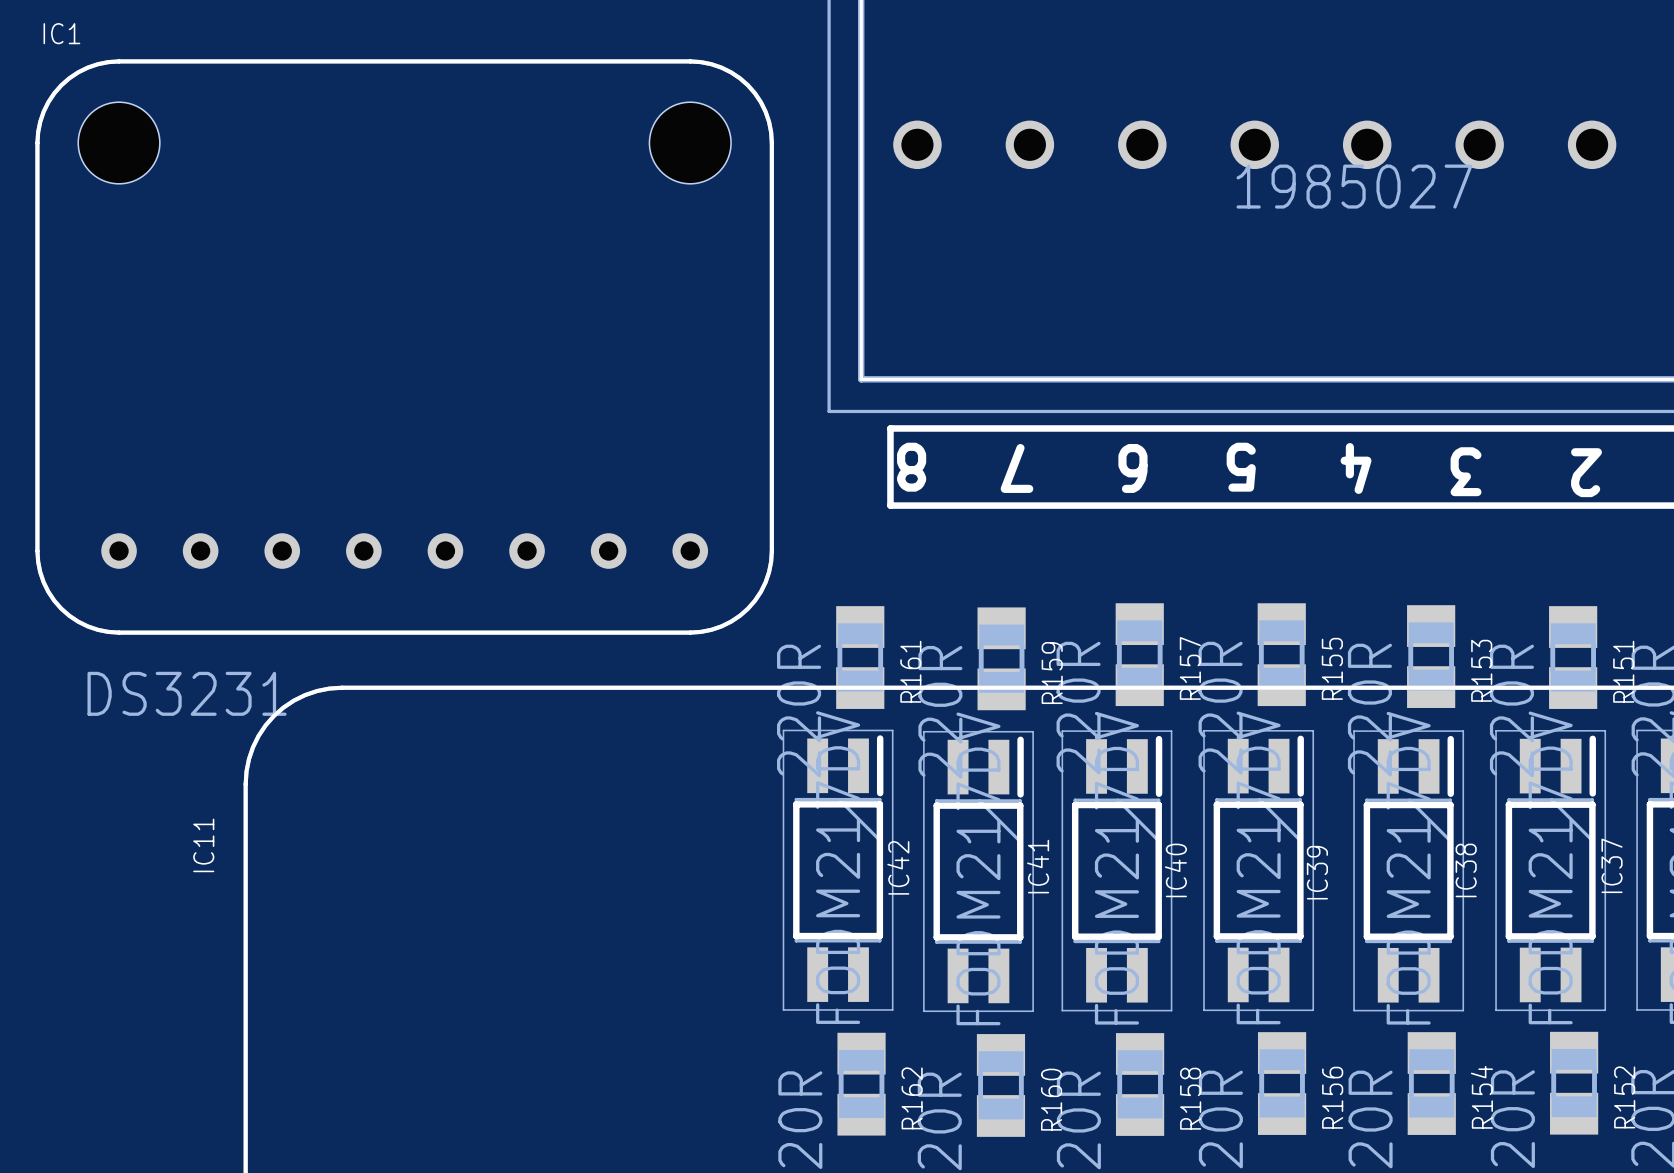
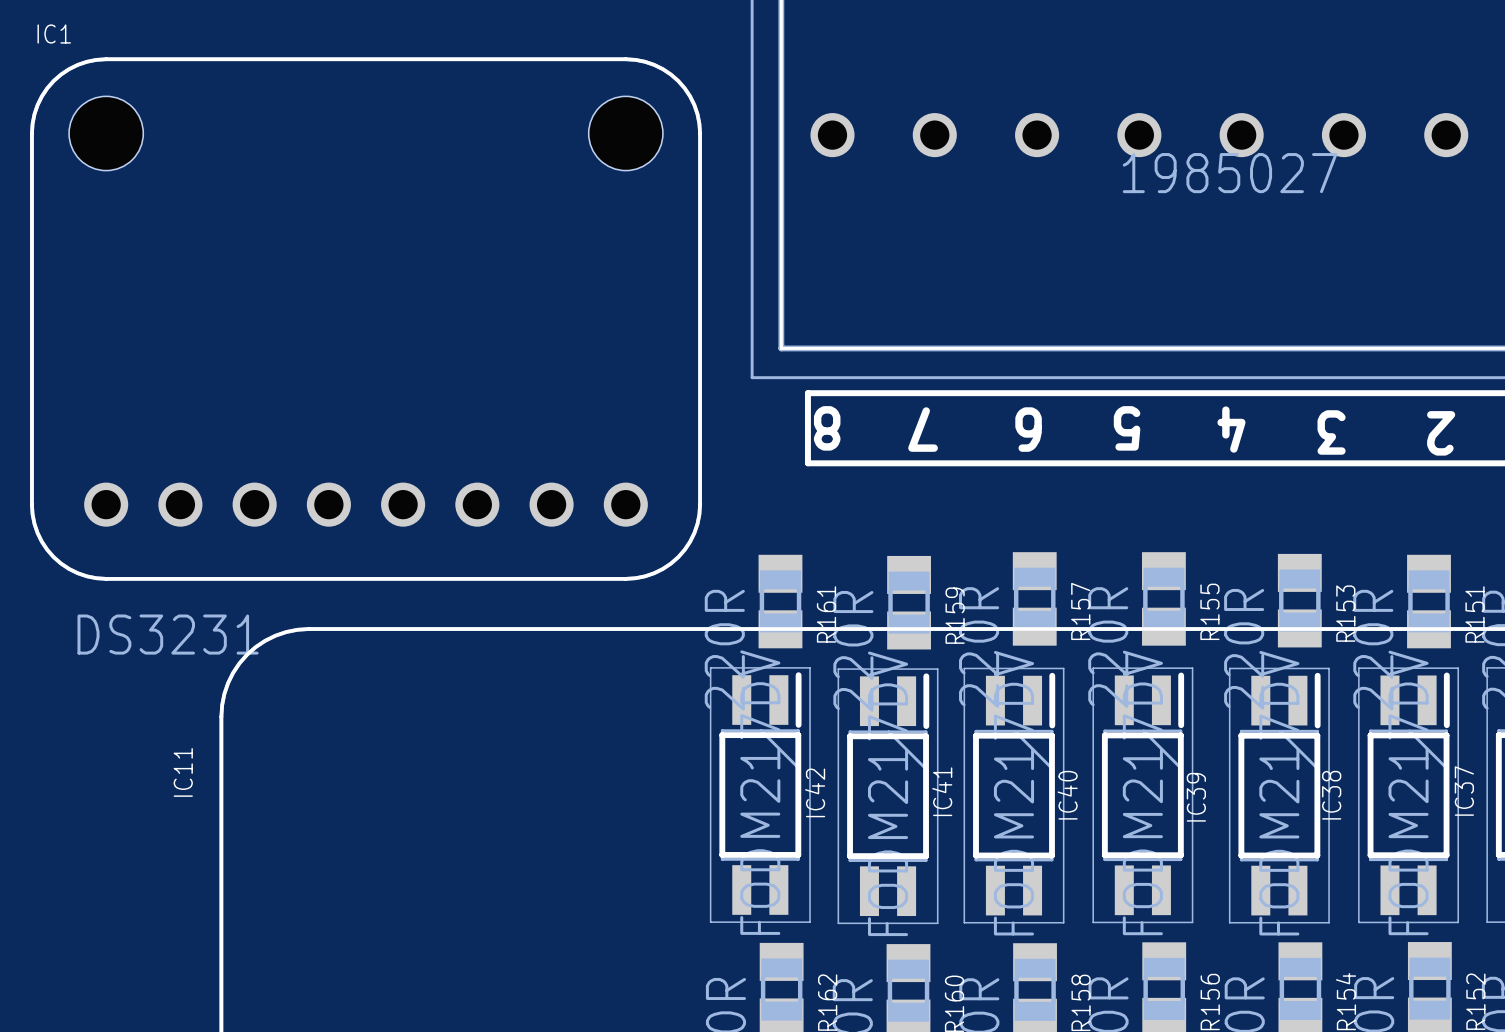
IC1 footprint: [35, 59, 774, 635] -> [30, 57, 702, 581]

